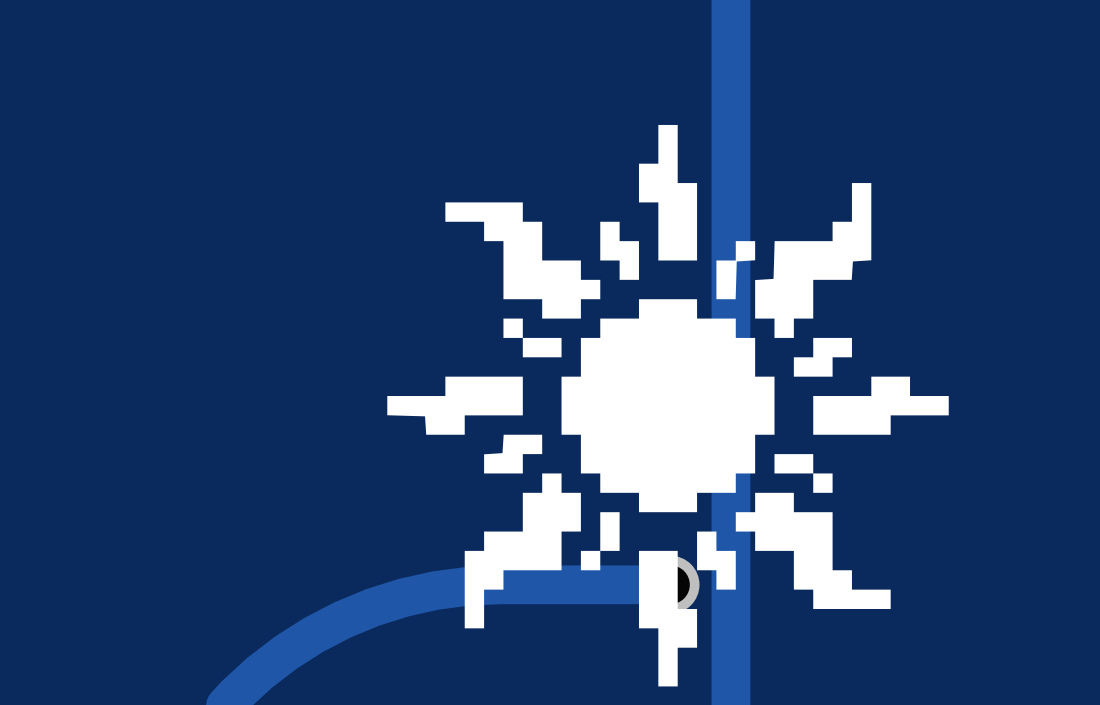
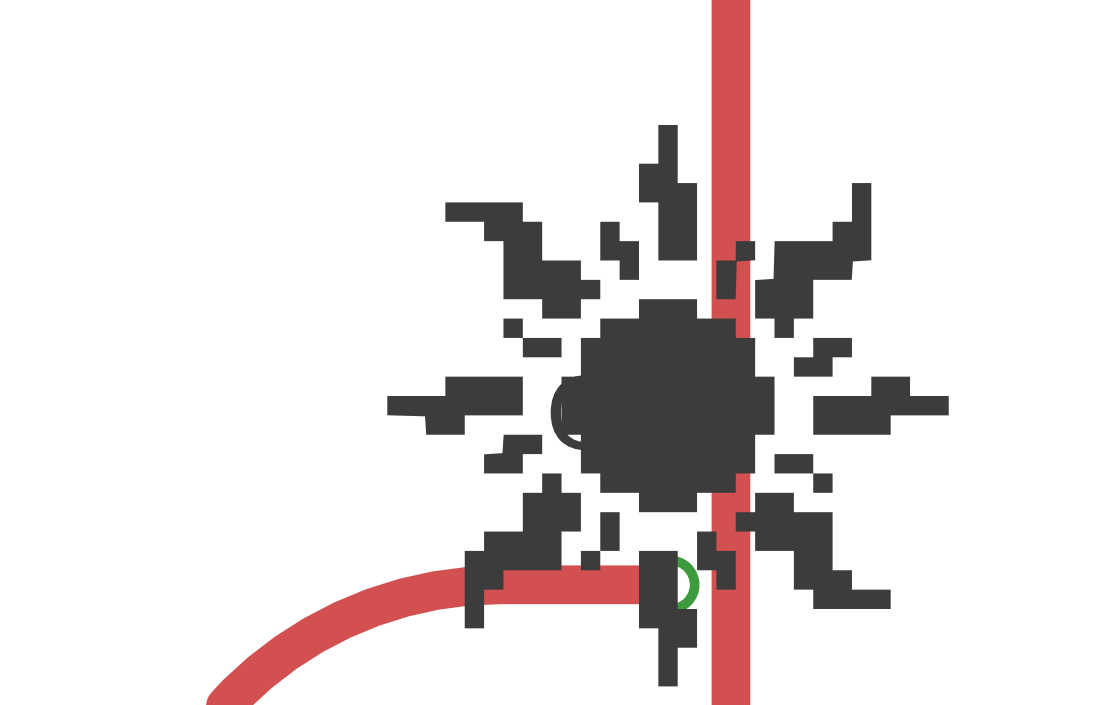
drawing: [387, 124, 949, 687] -> none
part: none -> (668, 405)

